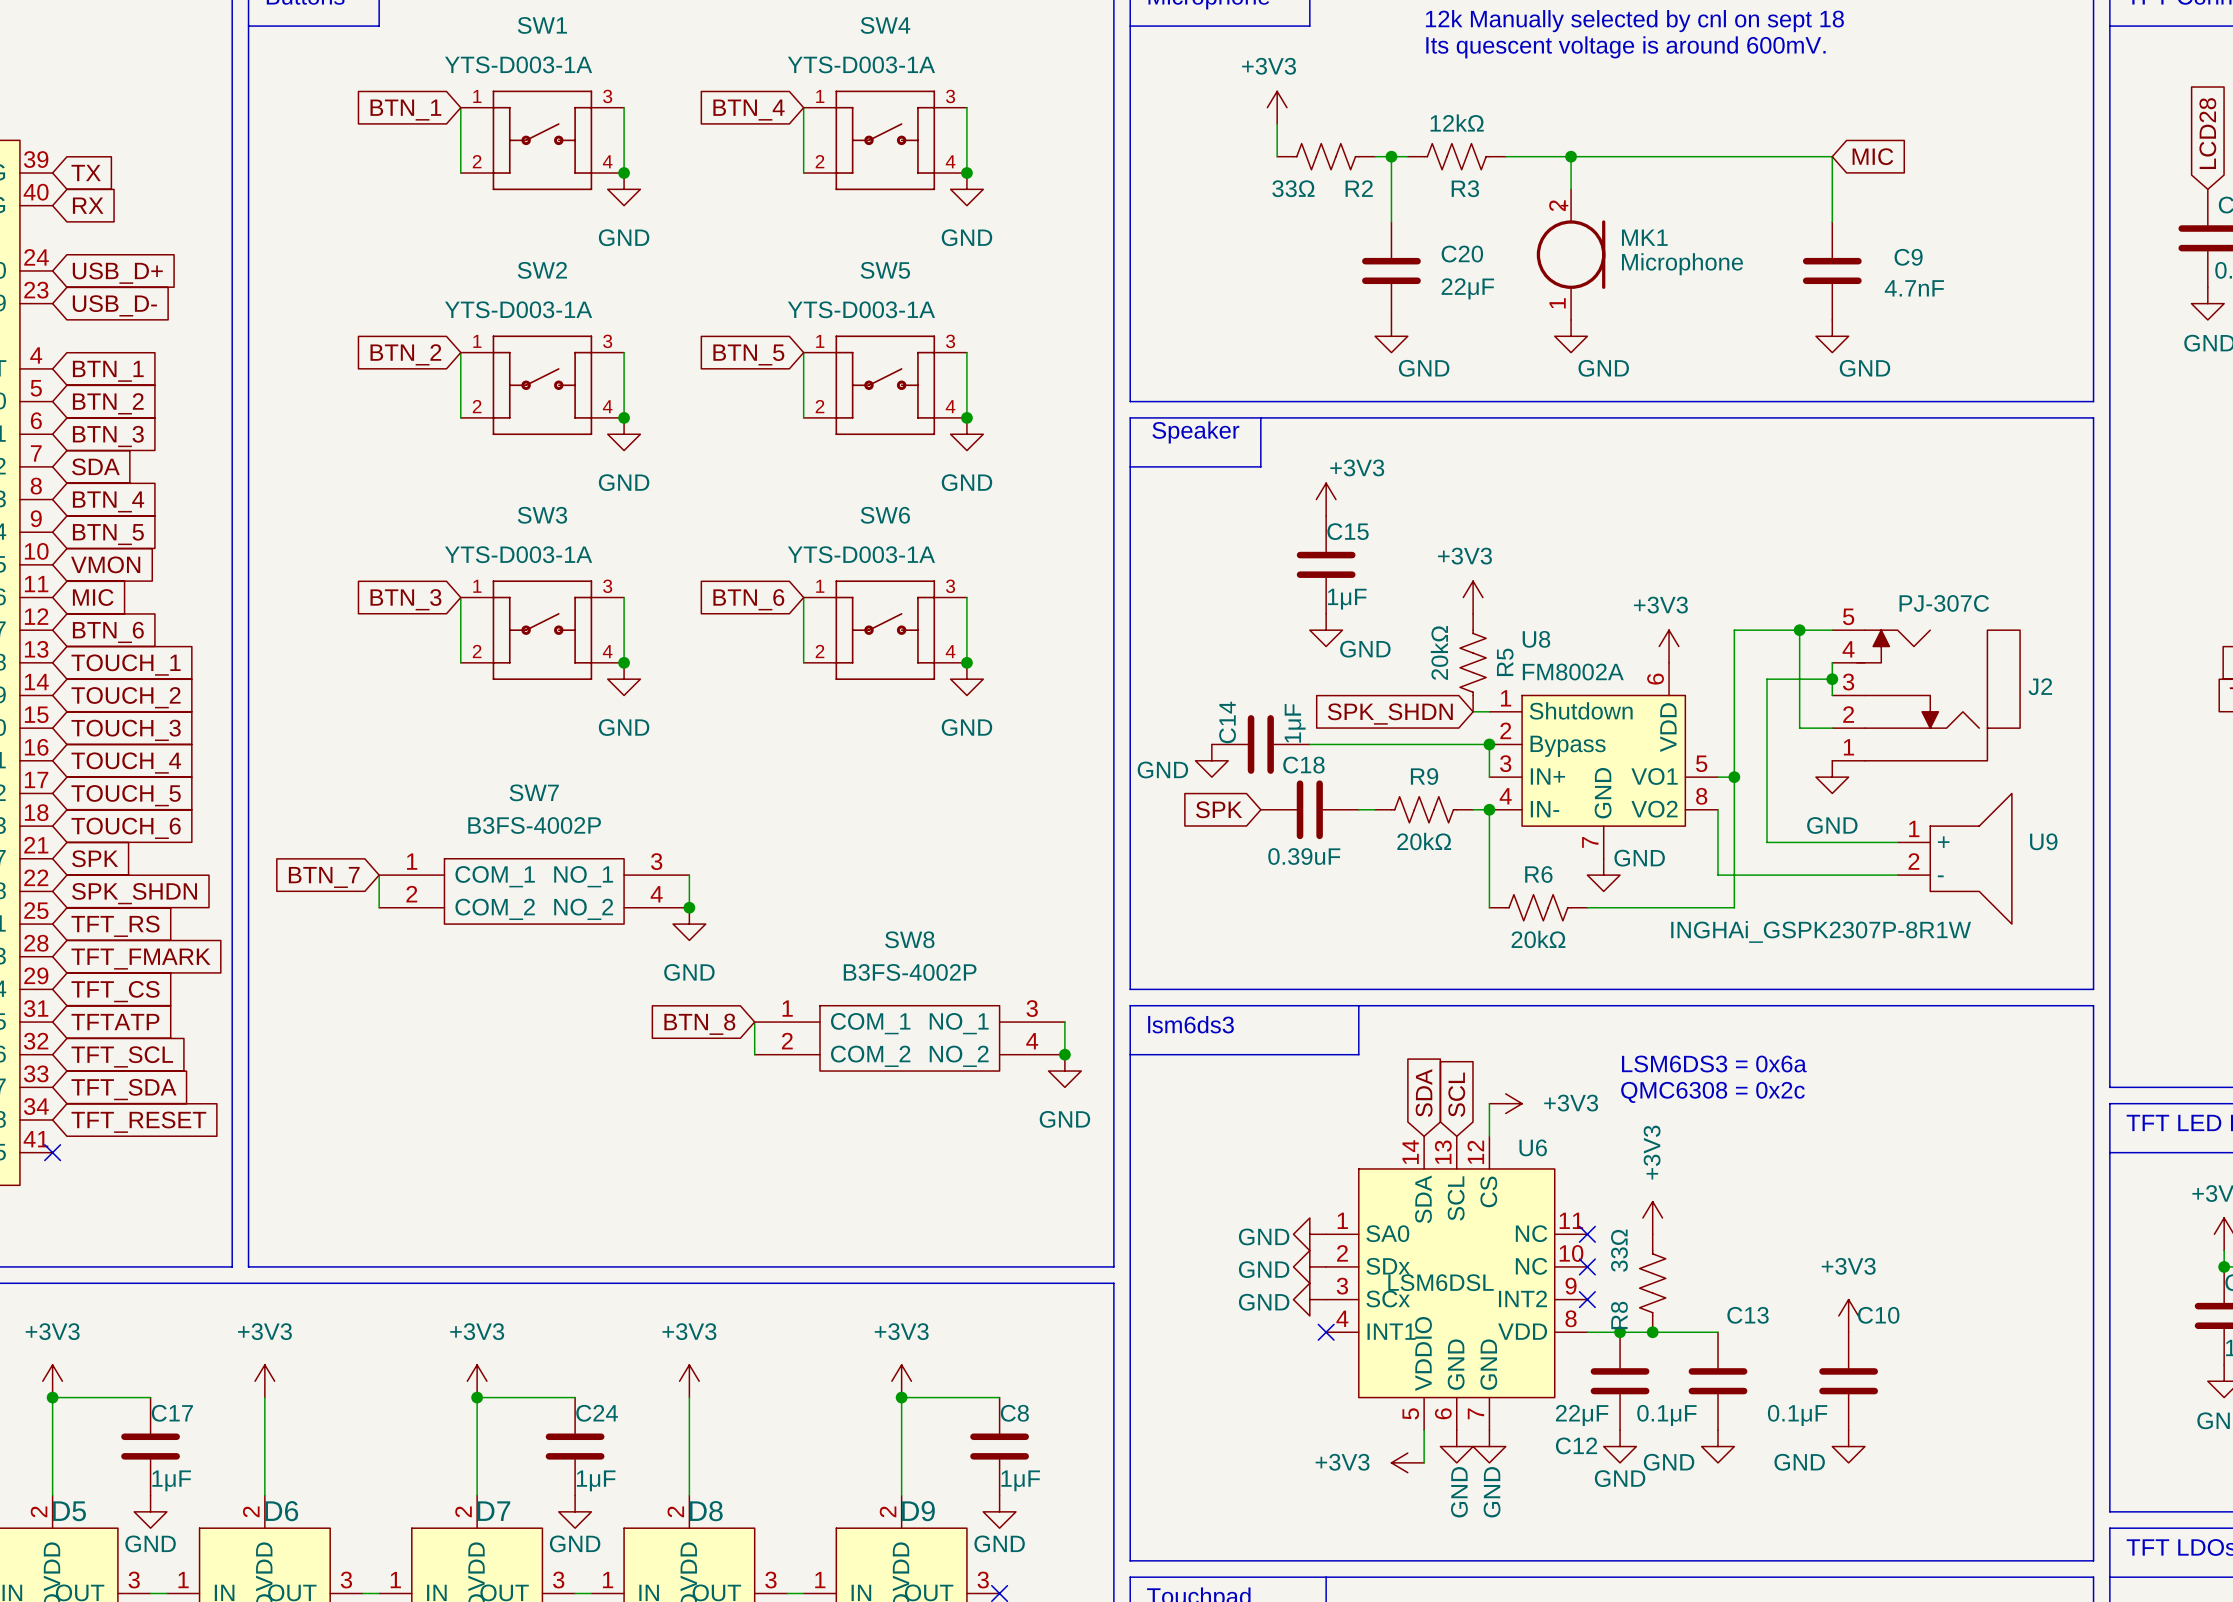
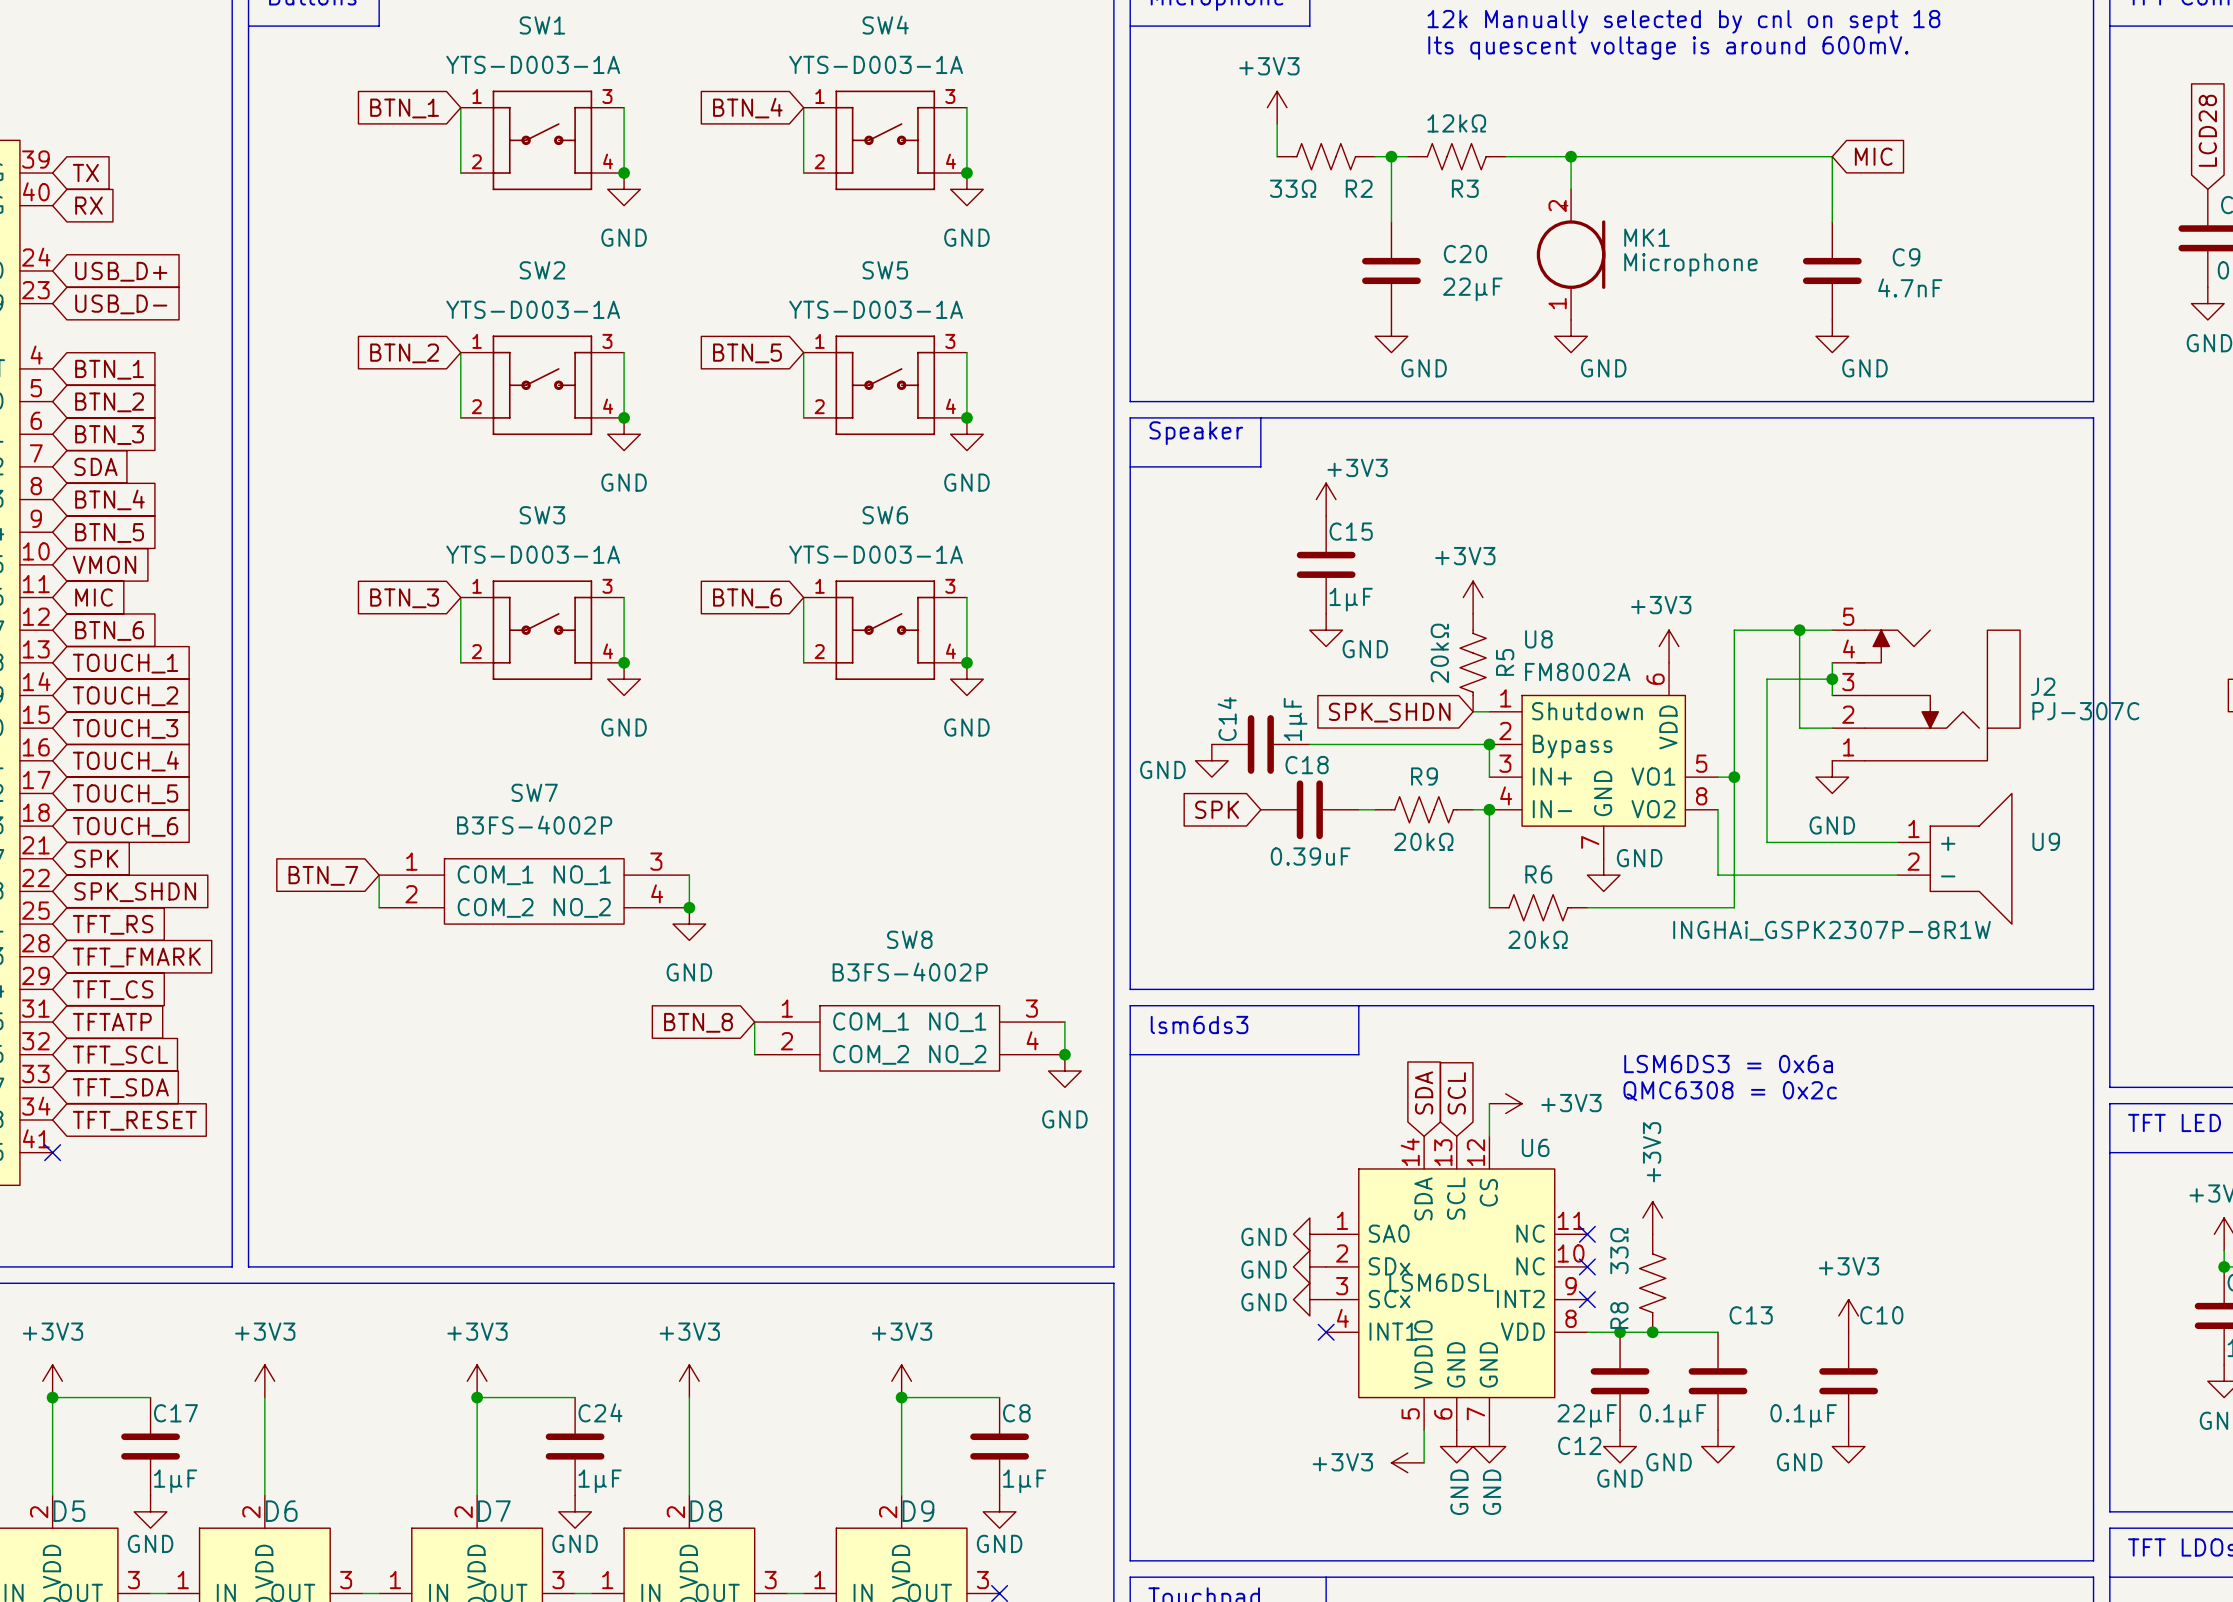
J2 value position: PJ-307C (1944, 603) -> PJ-307C (2085, 711)

